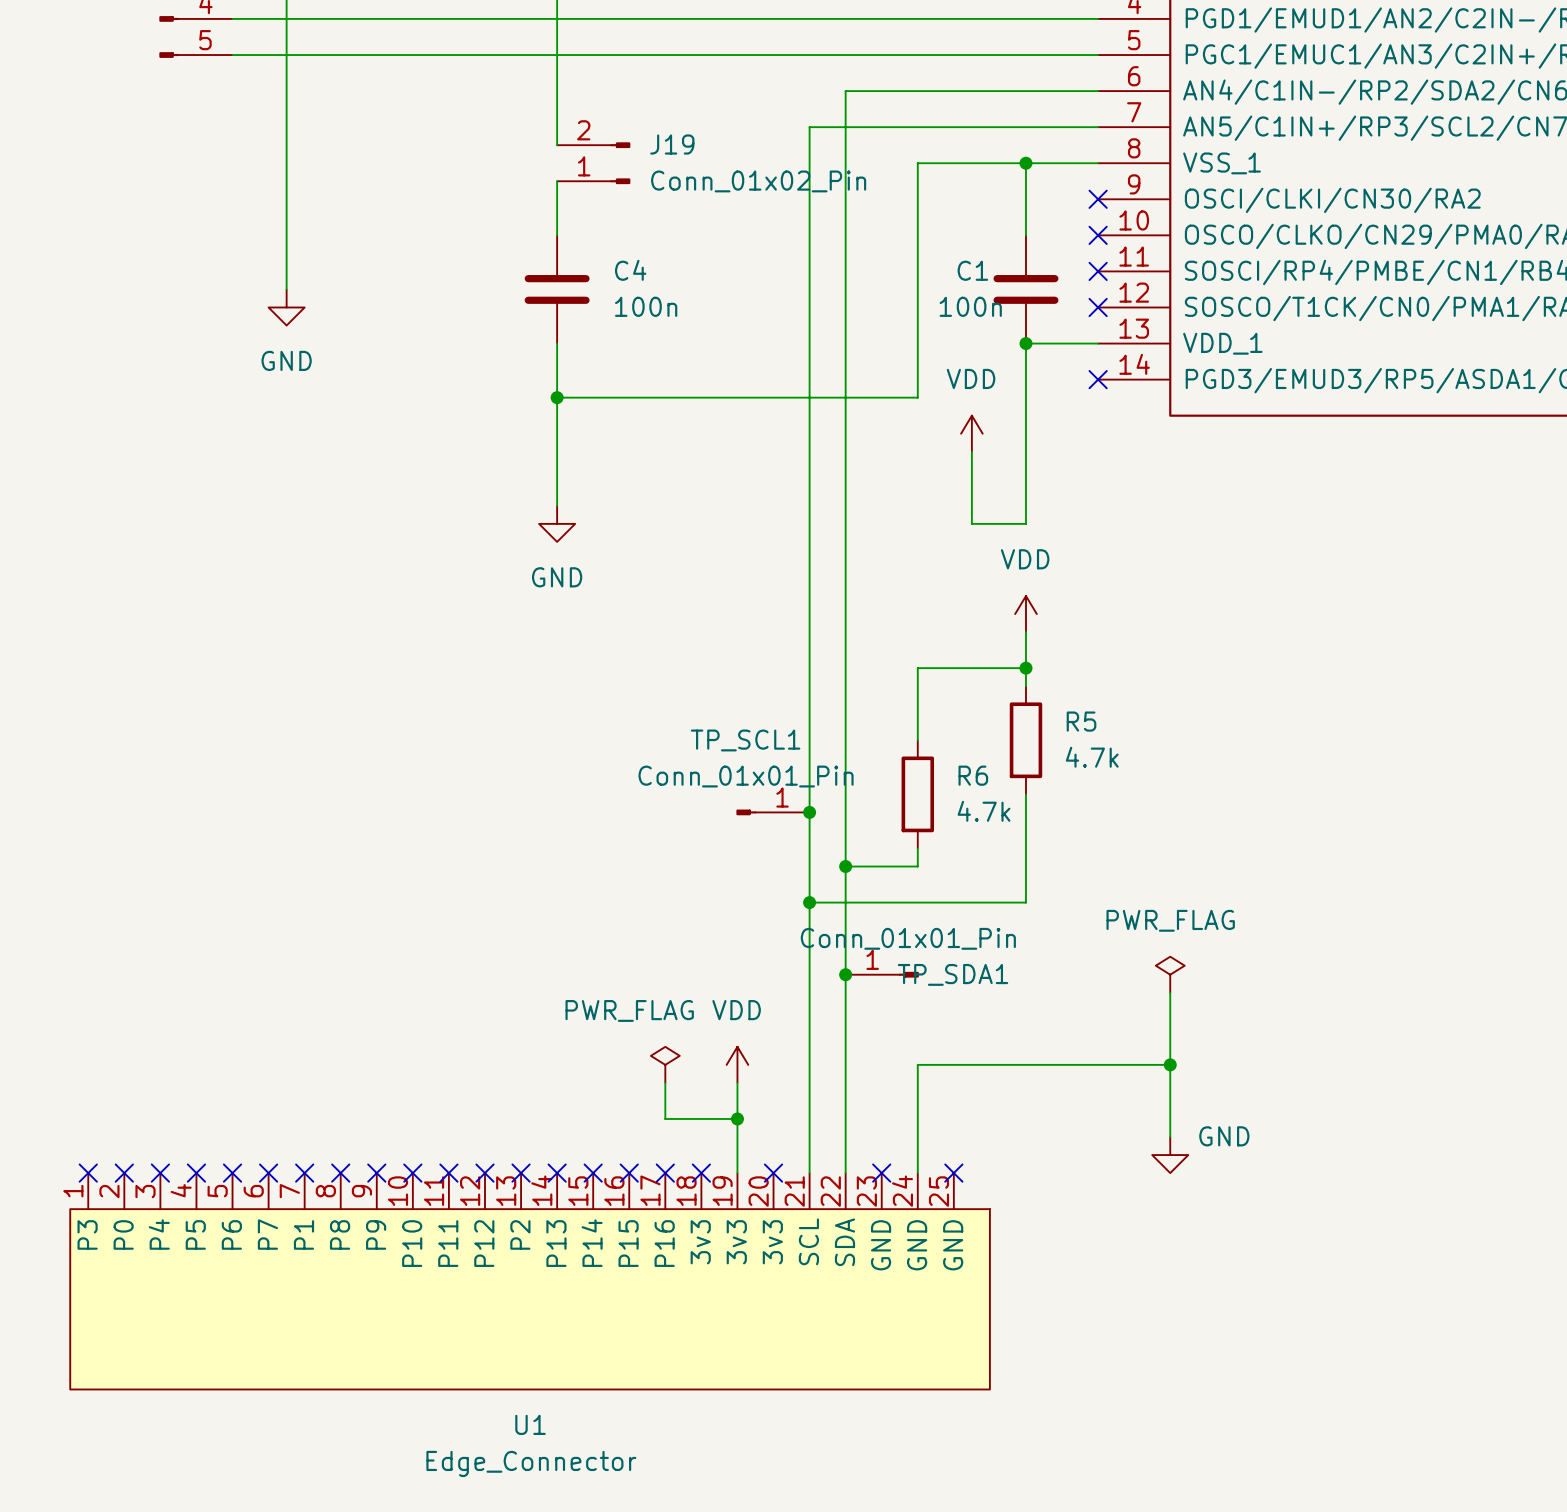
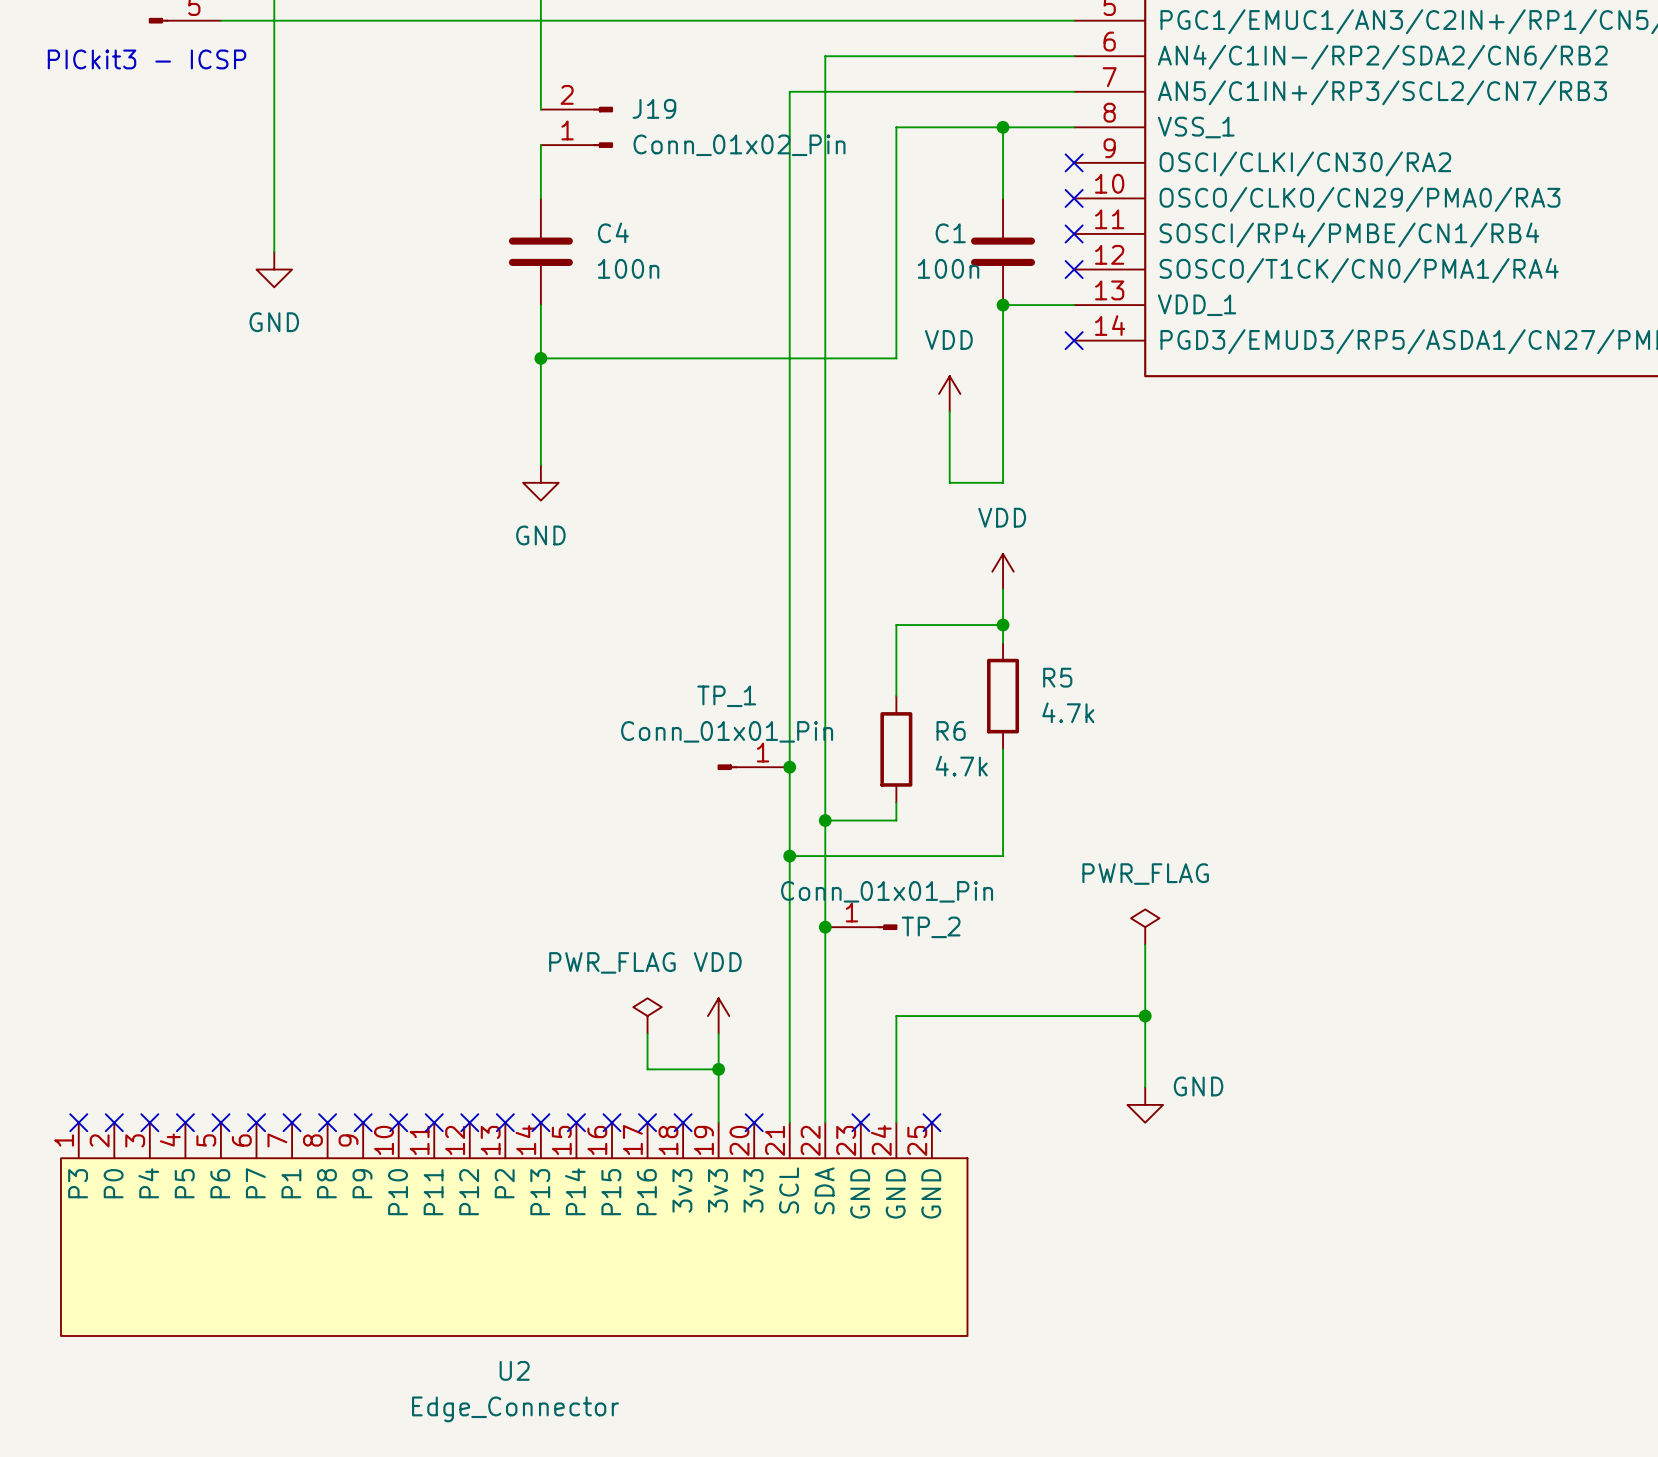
text: none -> PICkit3 - ICSP (147, 59)
TP_SCL1 name: TP_SCL1 (745, 740) -> TP_1 (726, 696)
TP_SDA1 name: TP_SDA1 (953, 974) -> TP_2 (931, 927)
U1 name: U1 (530, 1424) -> U2 (514, 1370)

